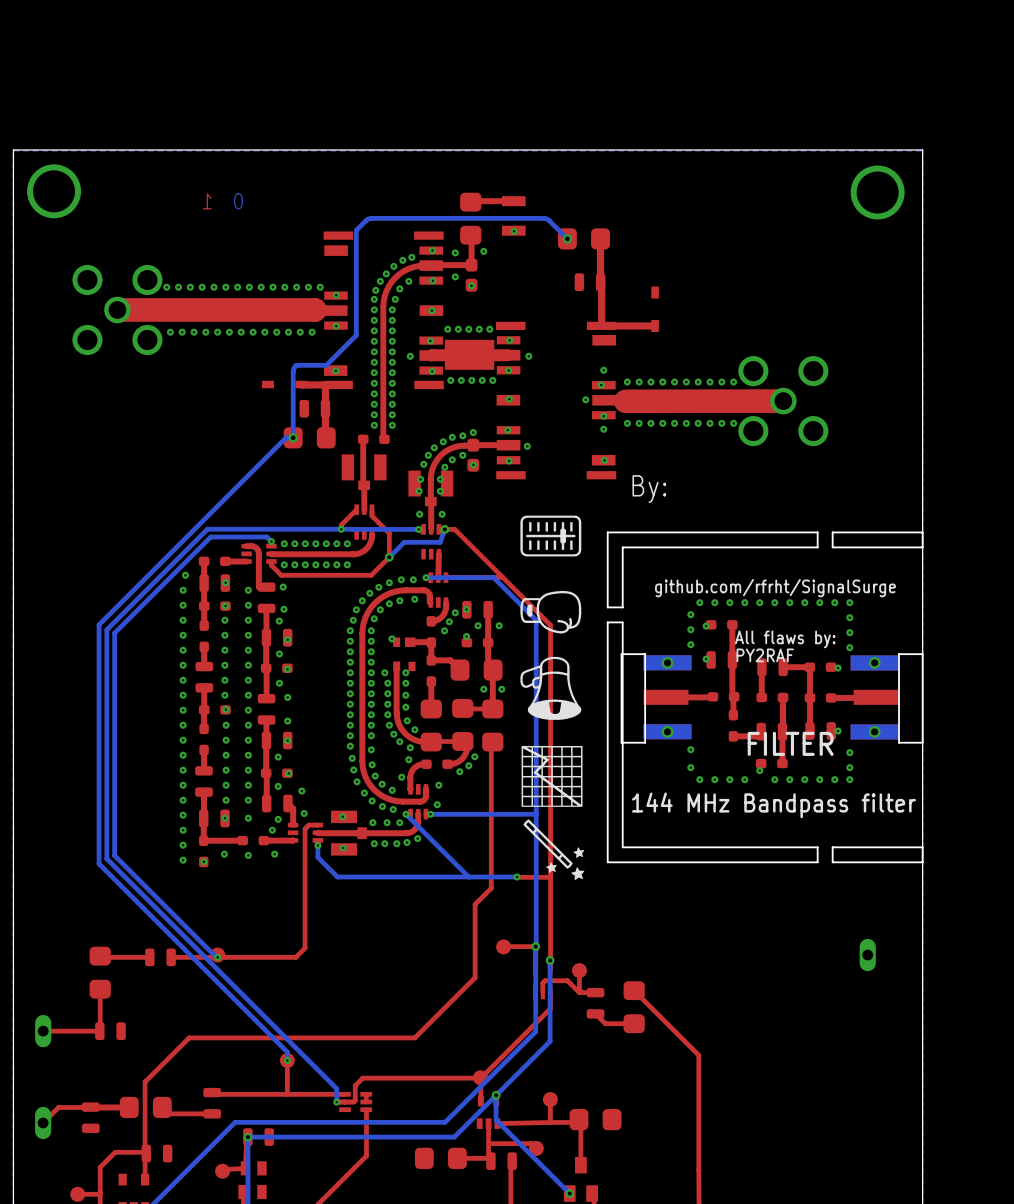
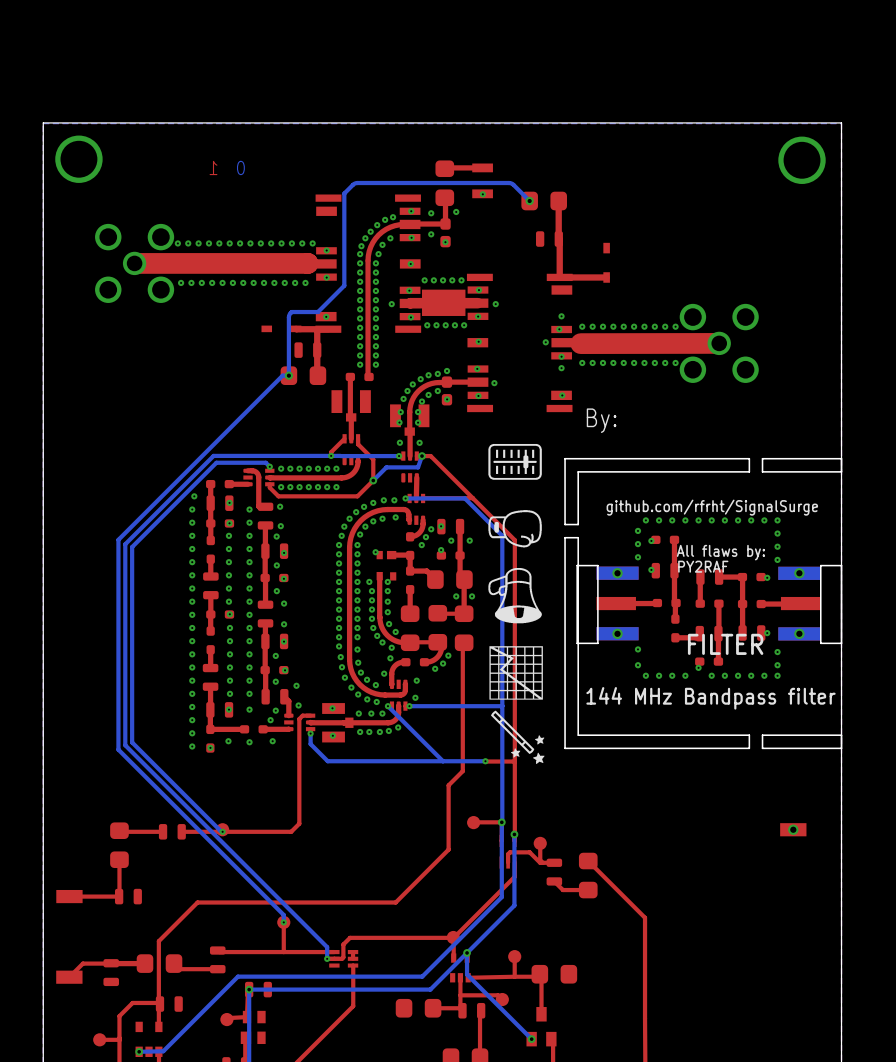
part footprint: [859, 938, 876, 972] -> [780, 823, 807, 837]
part footprint: [35, 1014, 52, 1048] -> [56, 889, 83, 904]
part footprint: [35, 1106, 52, 1140] -> [56, 970, 83, 984]

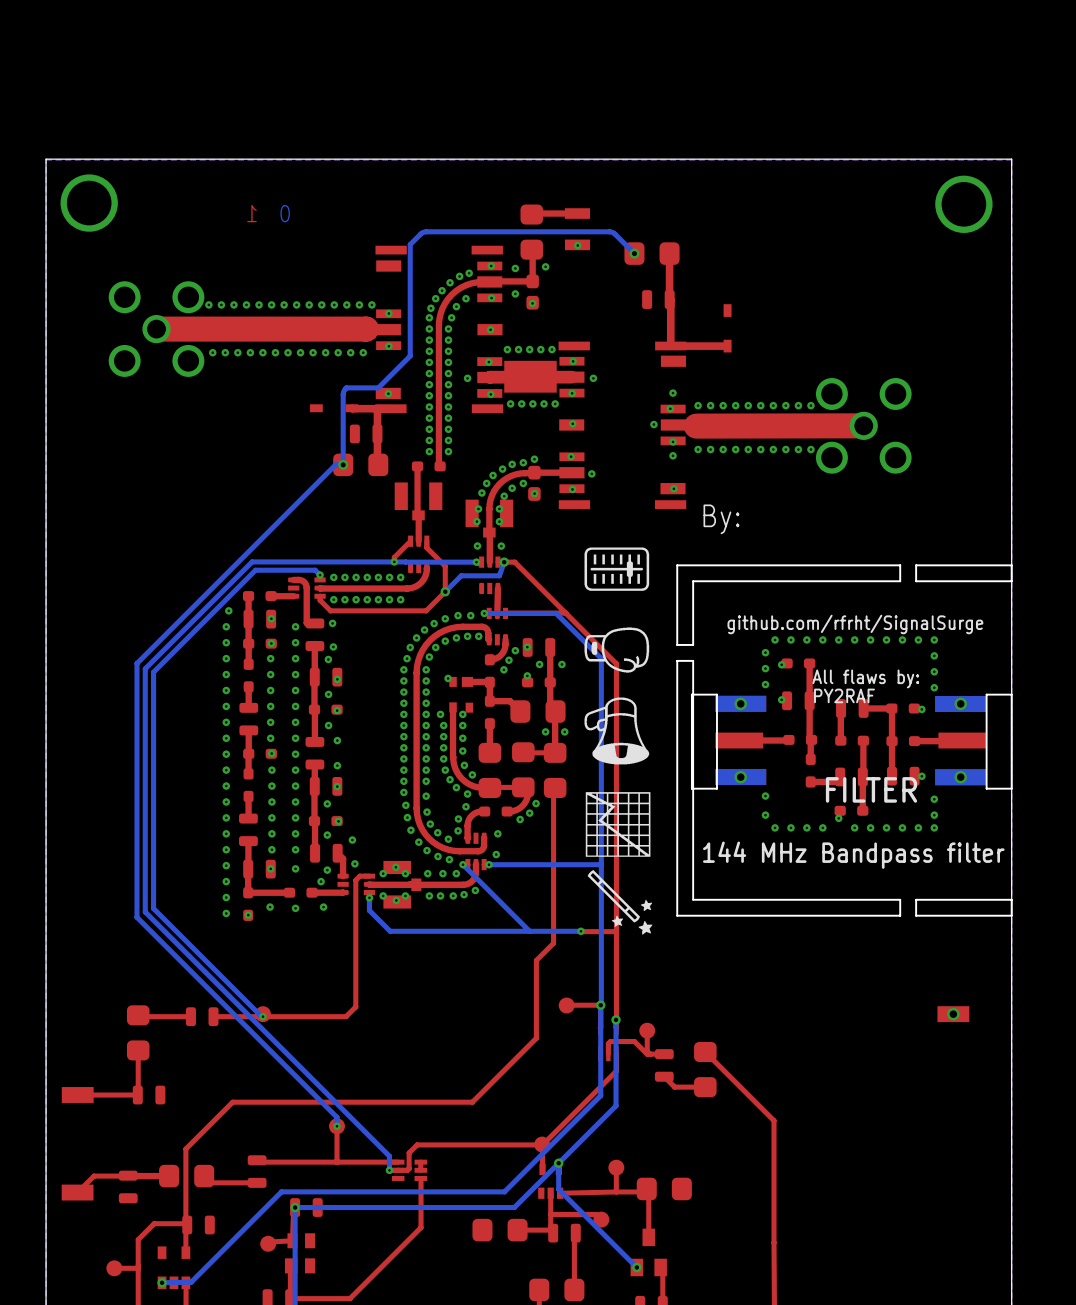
via: none -> (467, 636)
via: (395, 517) -> none
via: none -> (478, 636)
via: none -> (458, 818)
via: (384, 673) -> none
via: none -> (458, 830)
via: none -> (383, 873)
via: none -> (405, 873)
via: none -> (383, 895)
via: none -> (405, 895)

